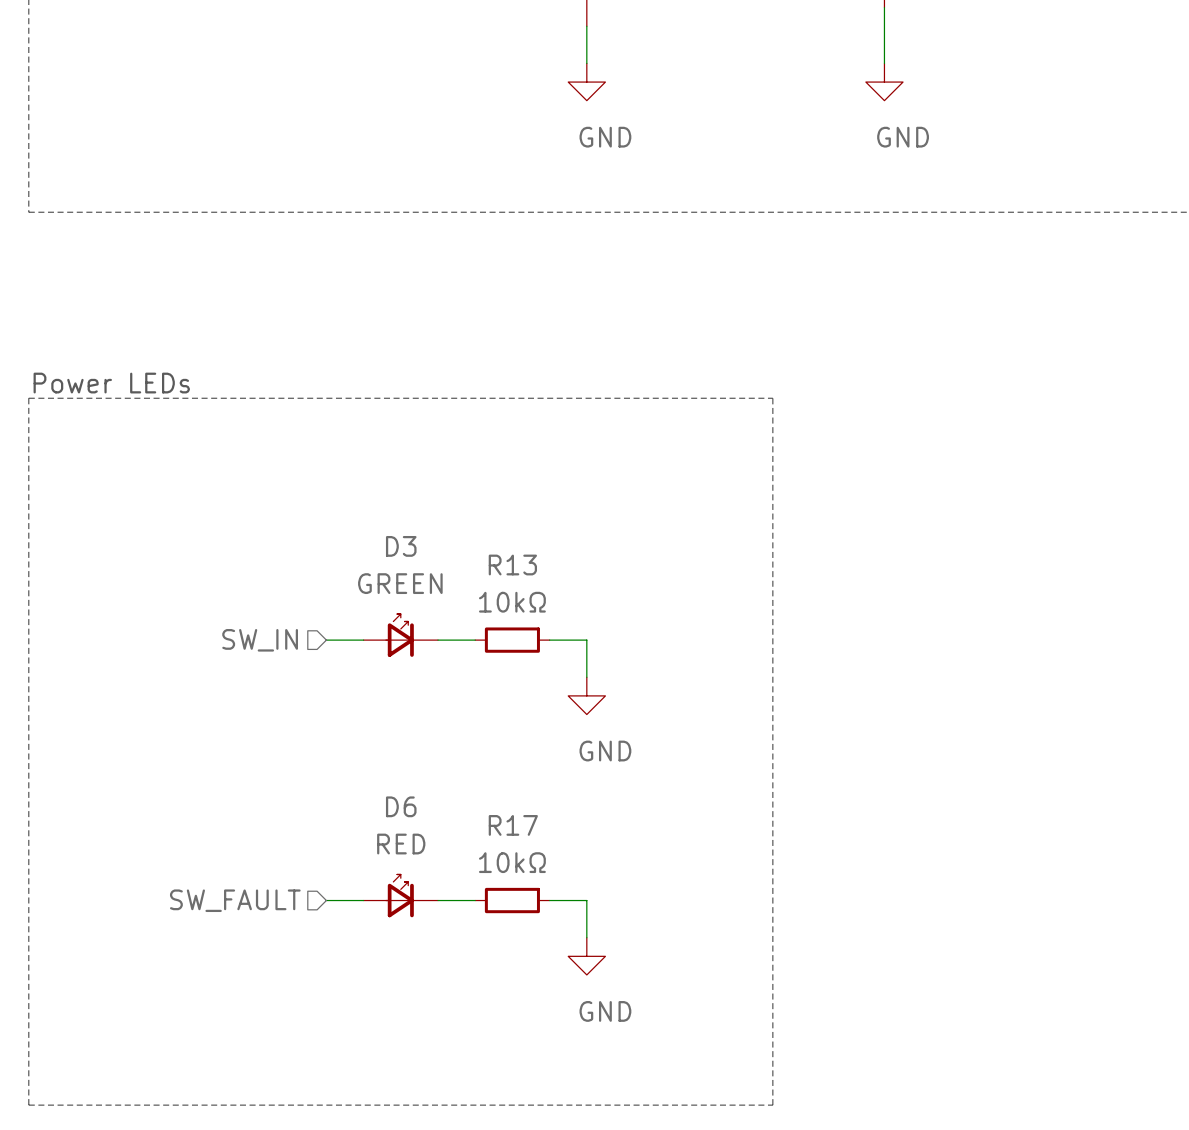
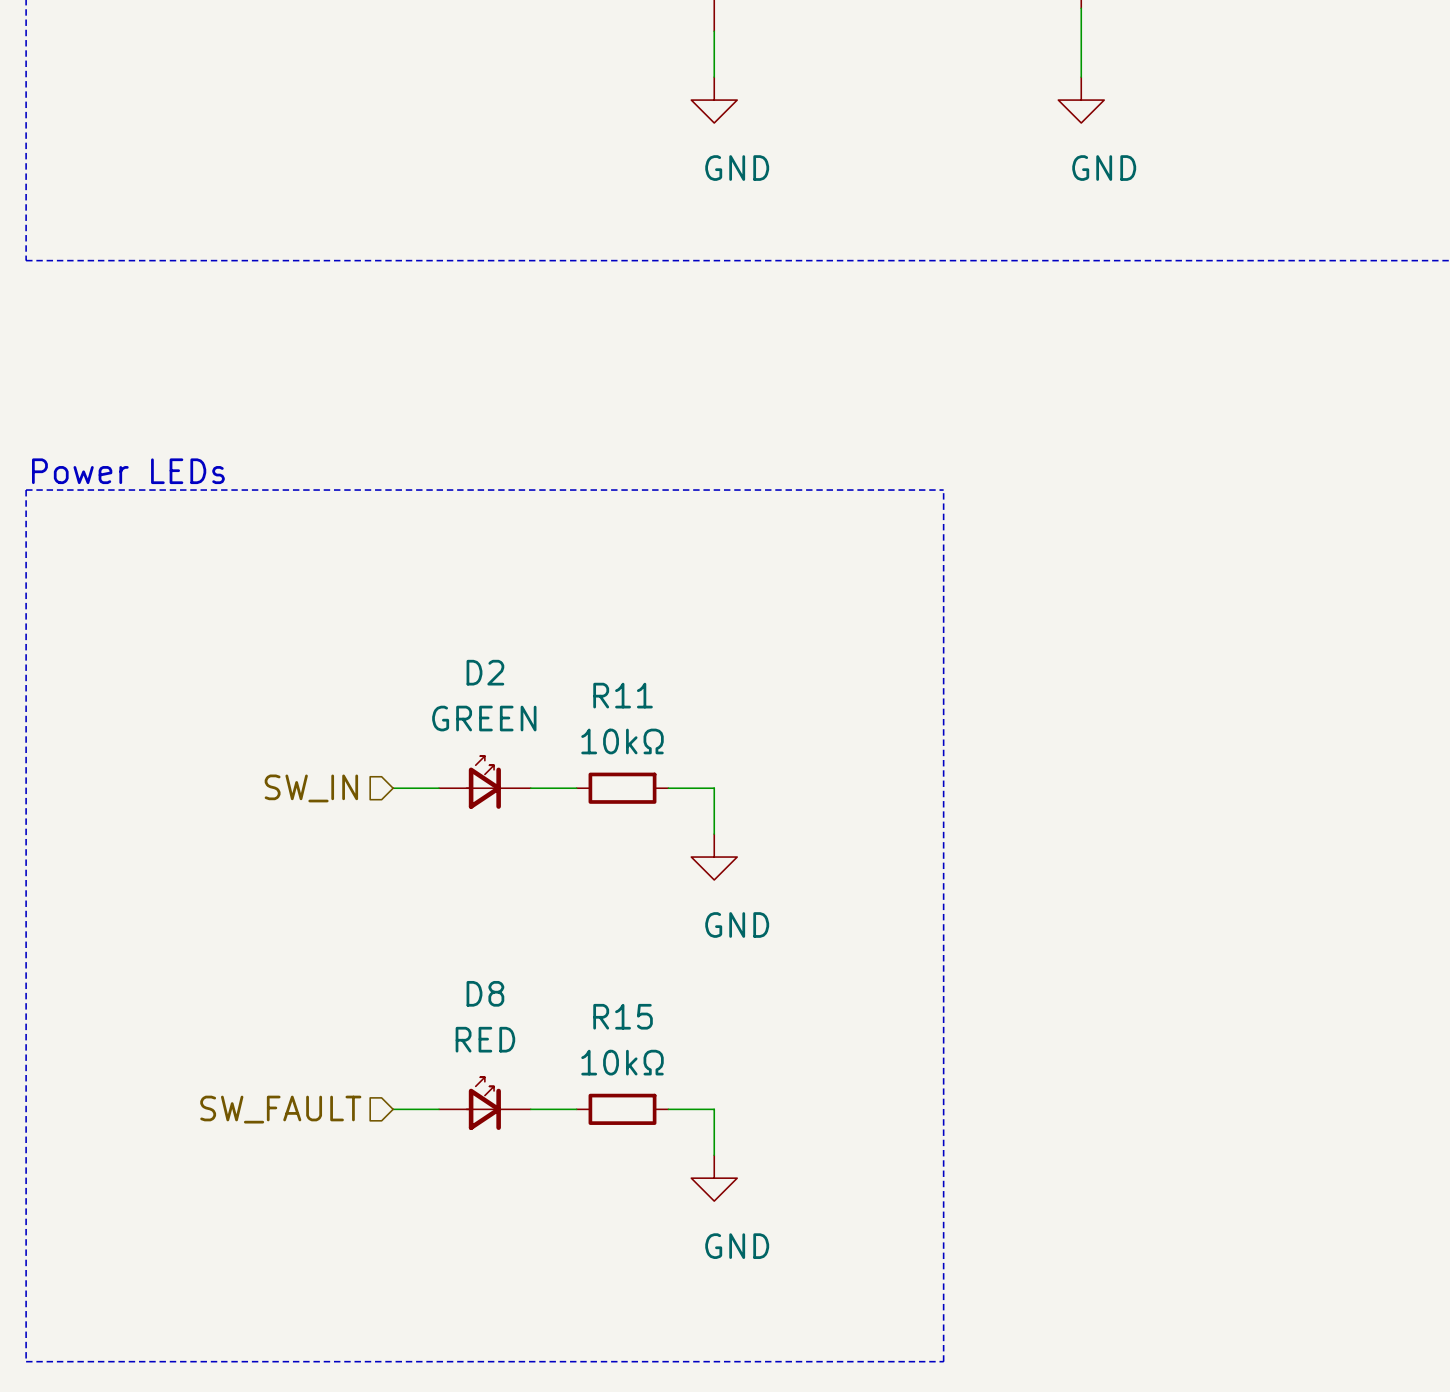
D3 name: D3 (401, 546) -> D2 (485, 672)
R13 name: R13 (512, 565) -> R11 (623, 695)
D6 name: D6 (401, 806) -> D8 (485, 993)
R17 name: R17 (513, 825) -> R15 (623, 1016)

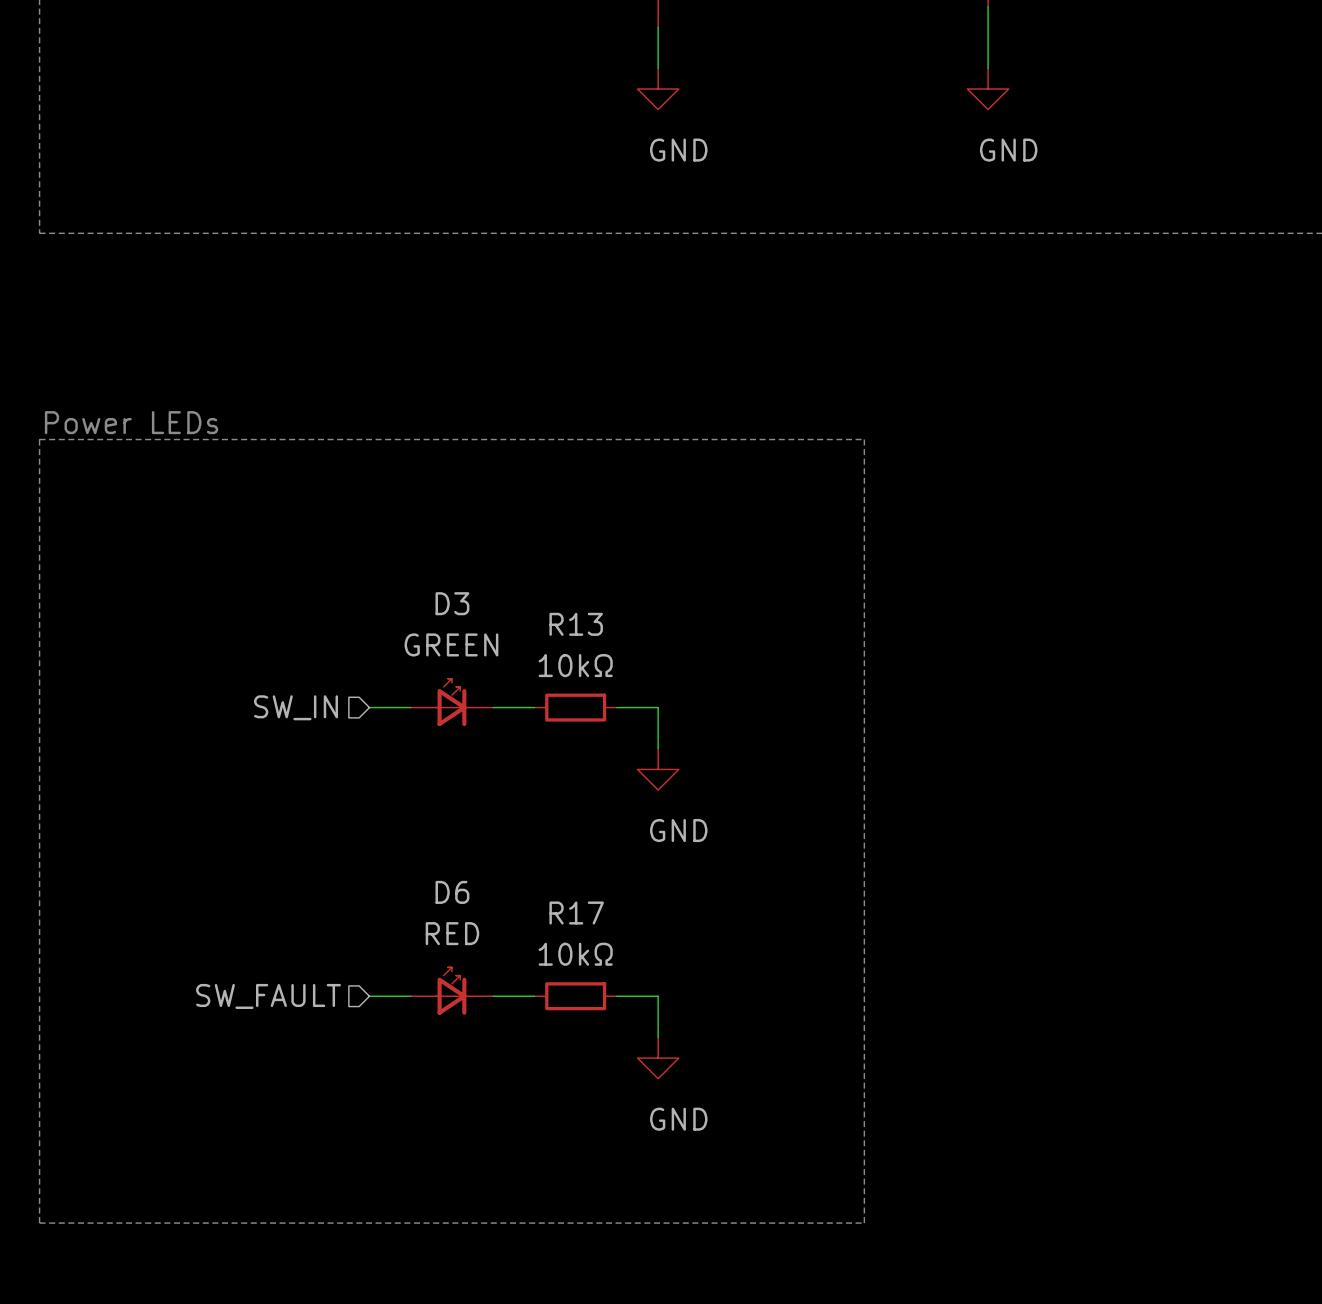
D2 name: D2 (485, 672) -> D3 (452, 603)
R11 name: R11 (623, 695) -> R13 (576, 624)
D8 name: D8 (485, 993) -> D6 (452, 892)
R15 name: R15 (623, 1016) -> R17 (576, 913)

